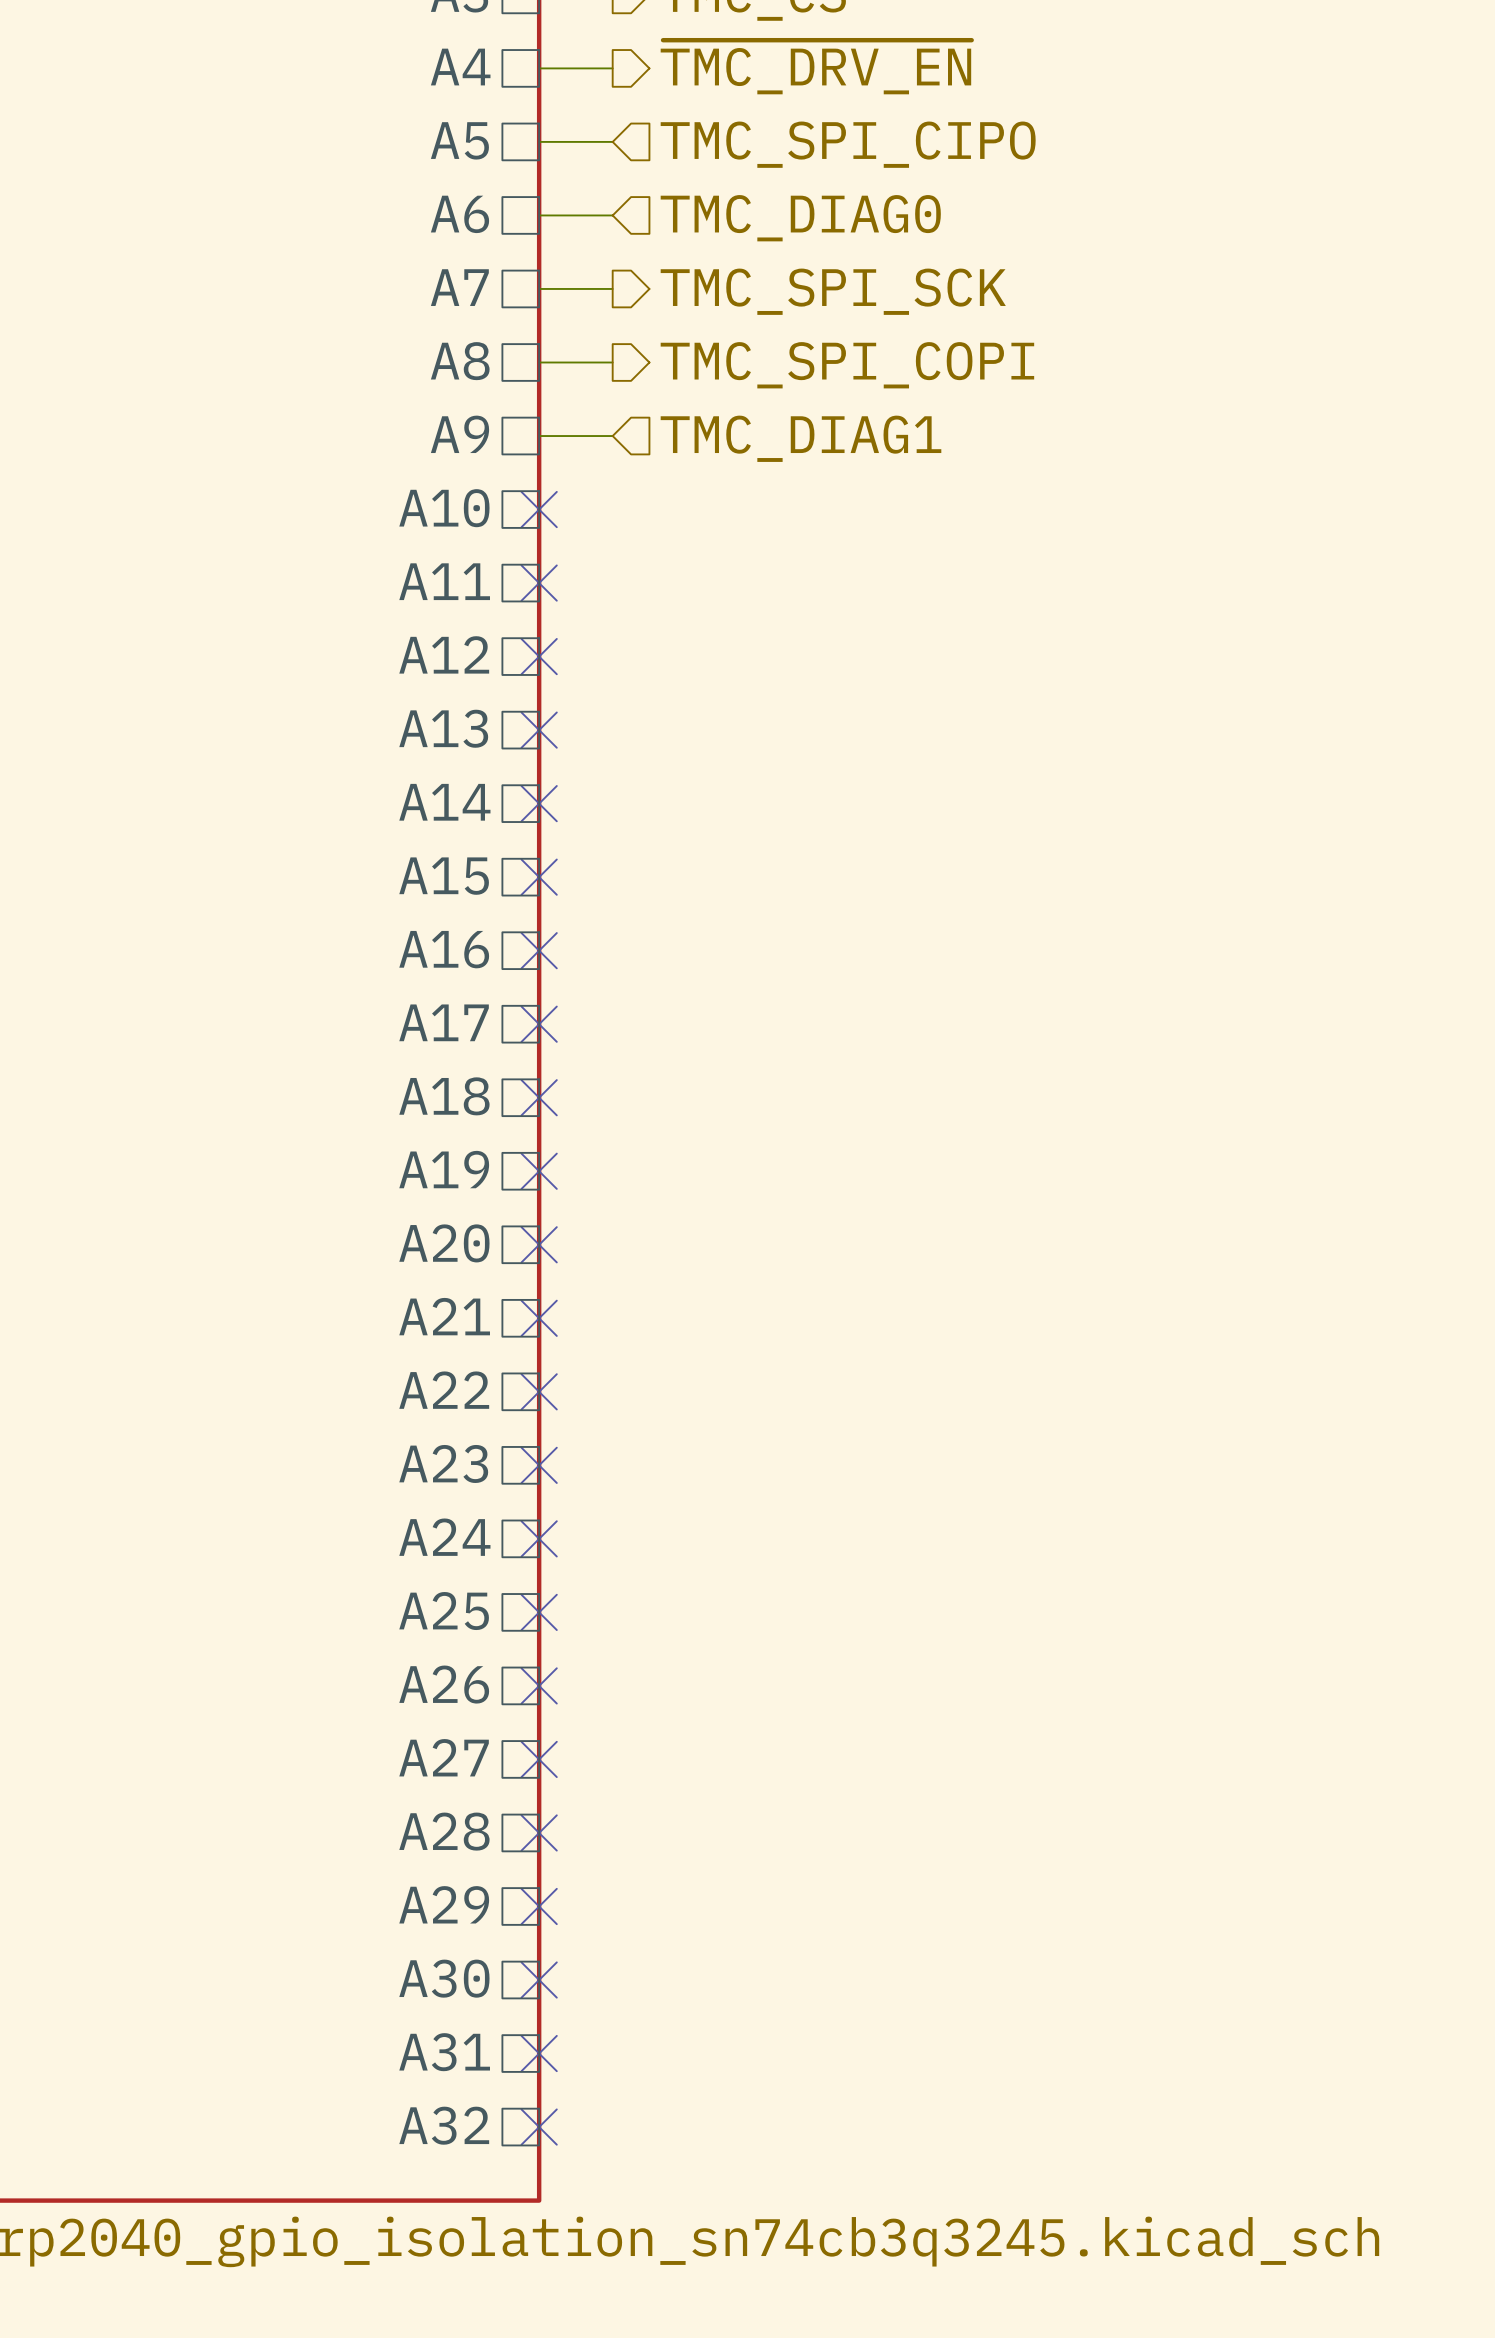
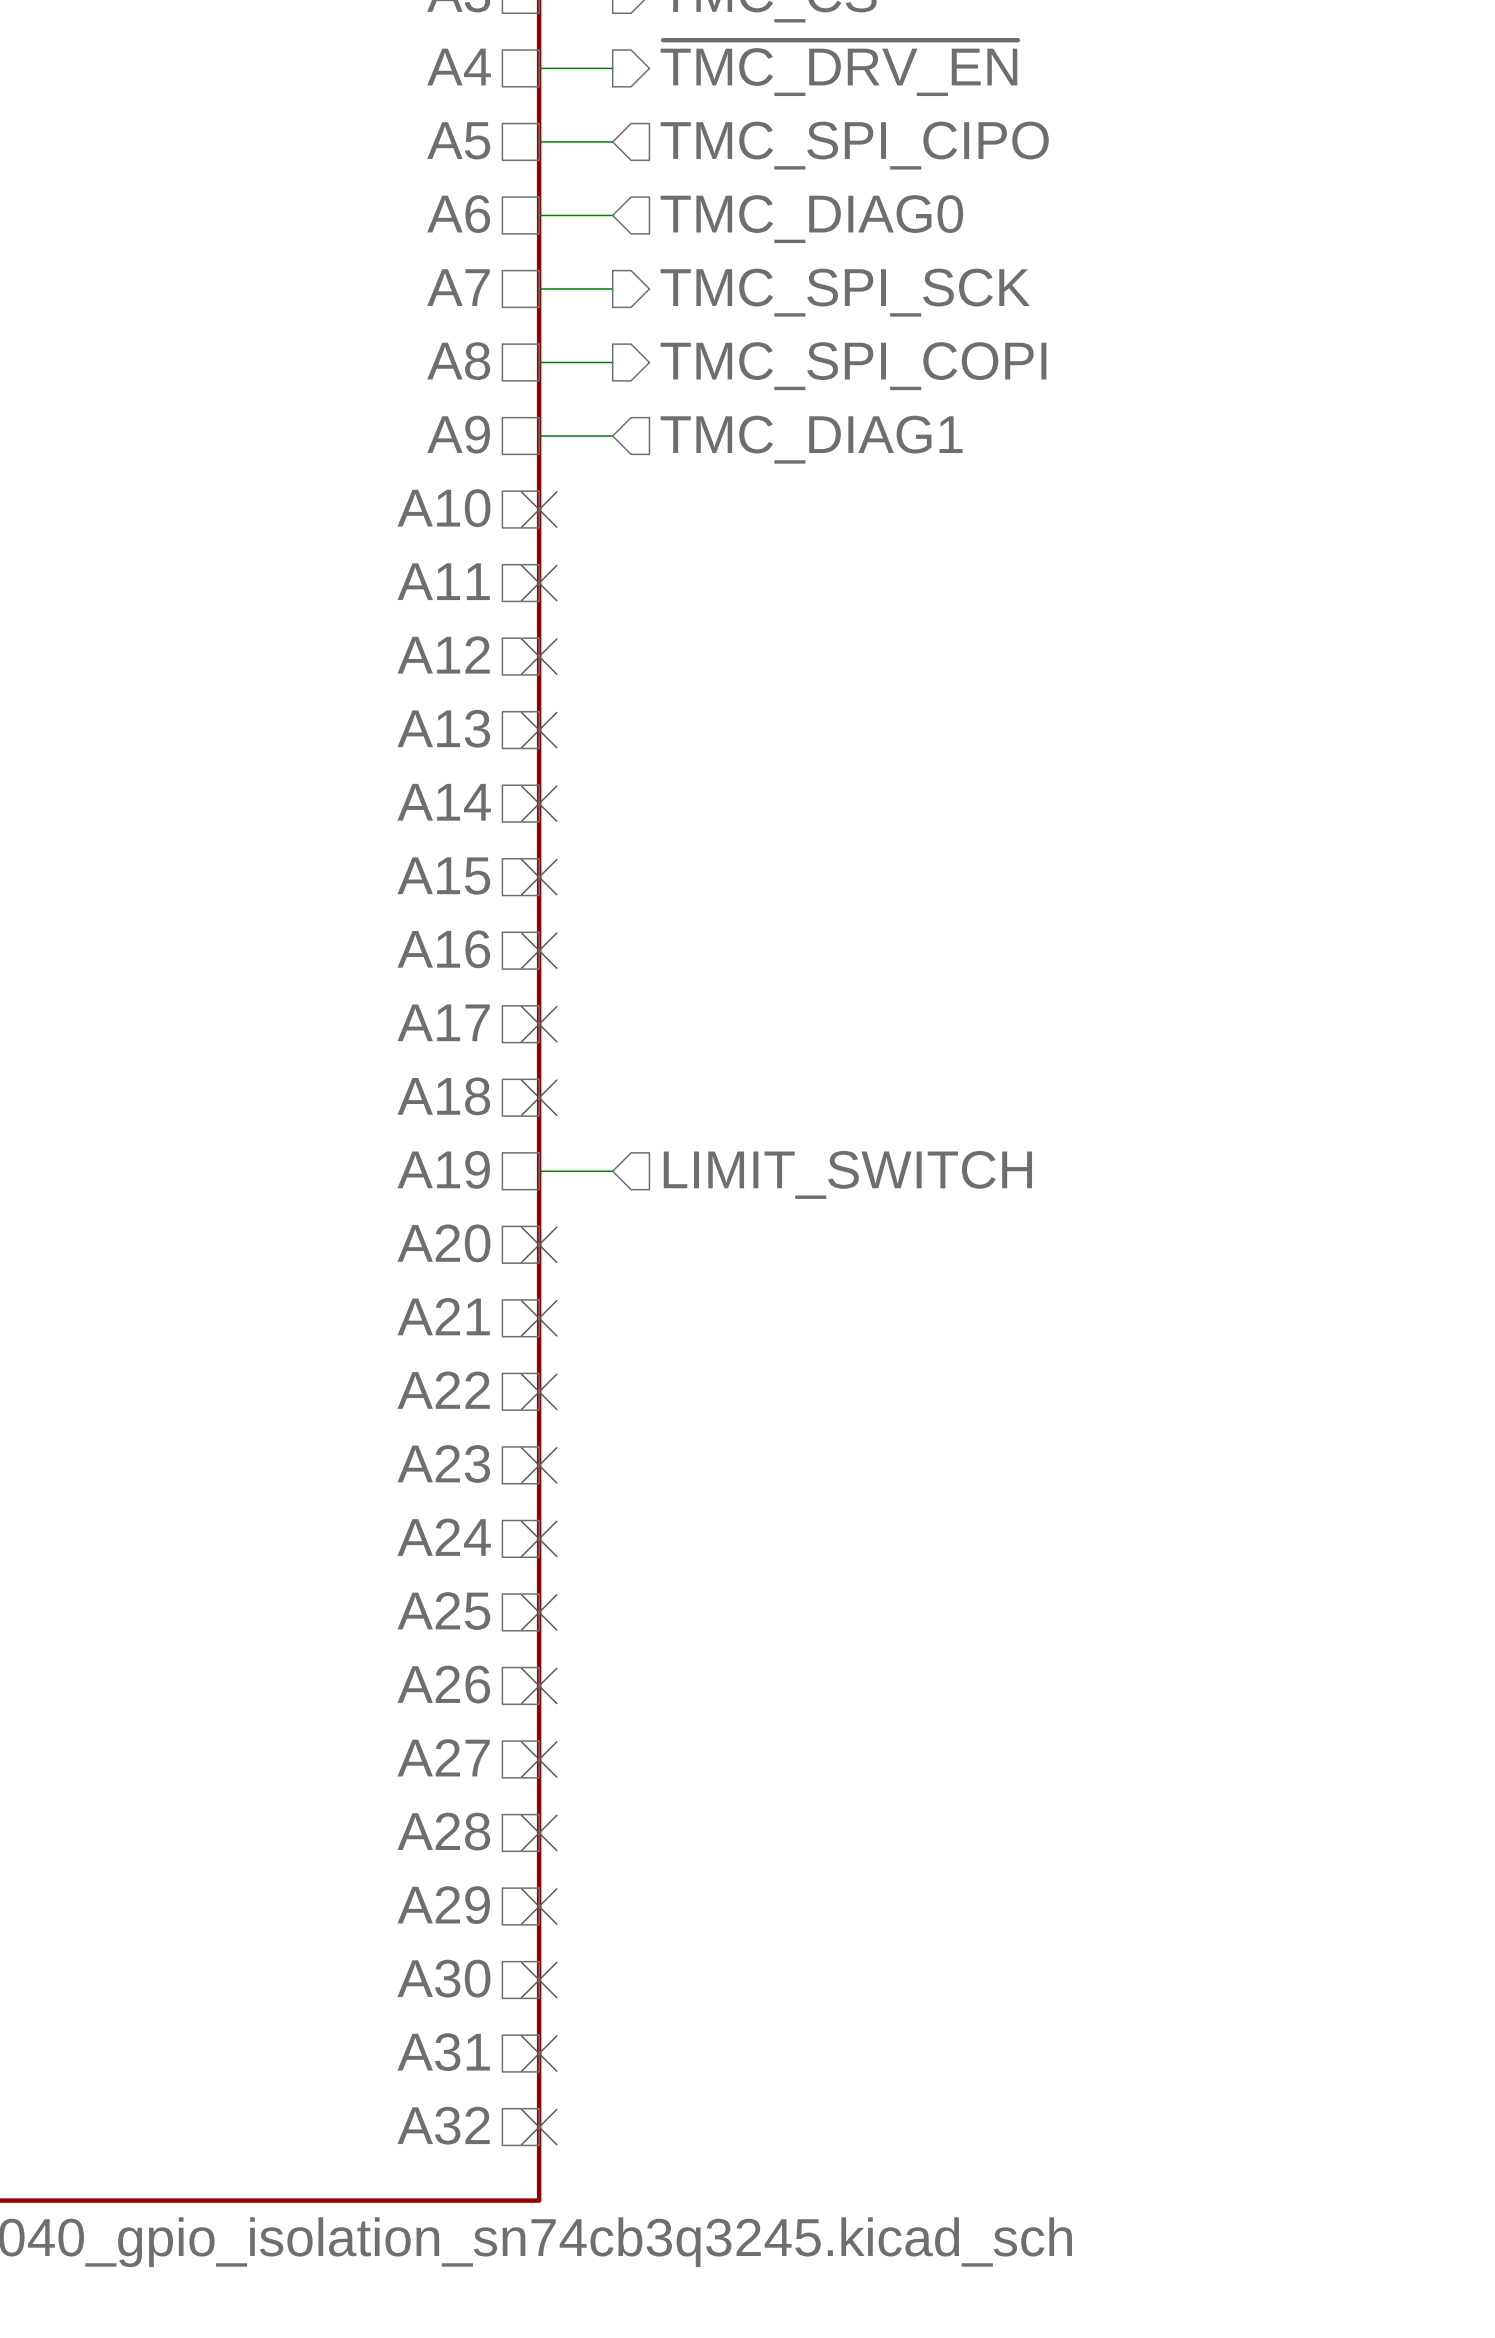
wire: none -> (539, 1171) (612, 1171)
no-connect mark: (539, 1171) -> none
hierarchical label: none -> LIMIT_SWITCH (847, 1174)

